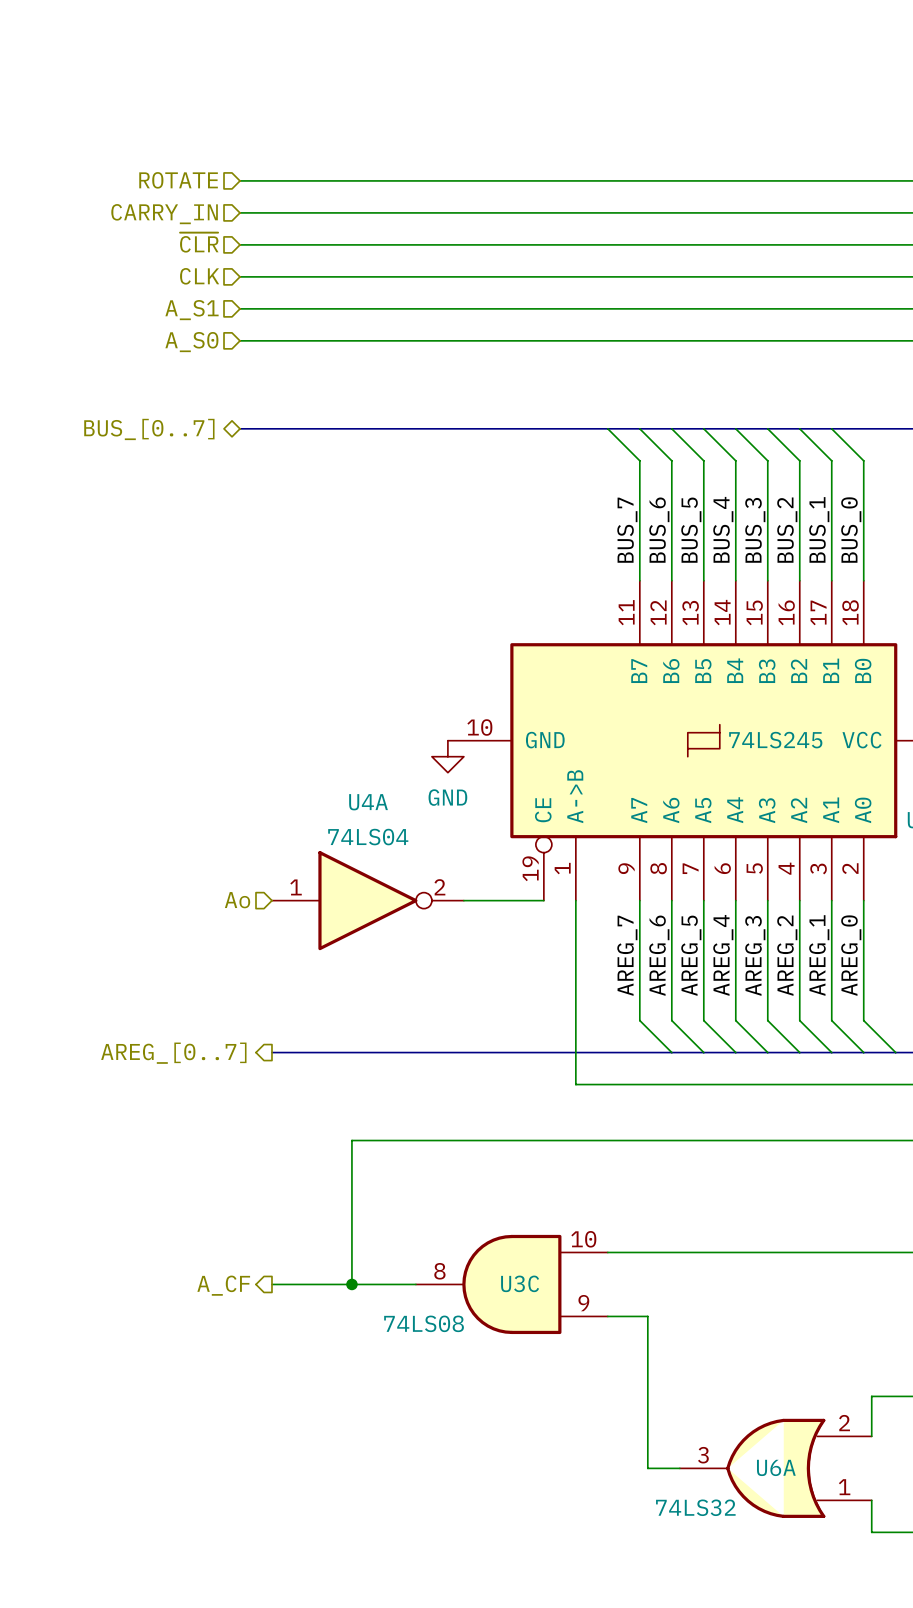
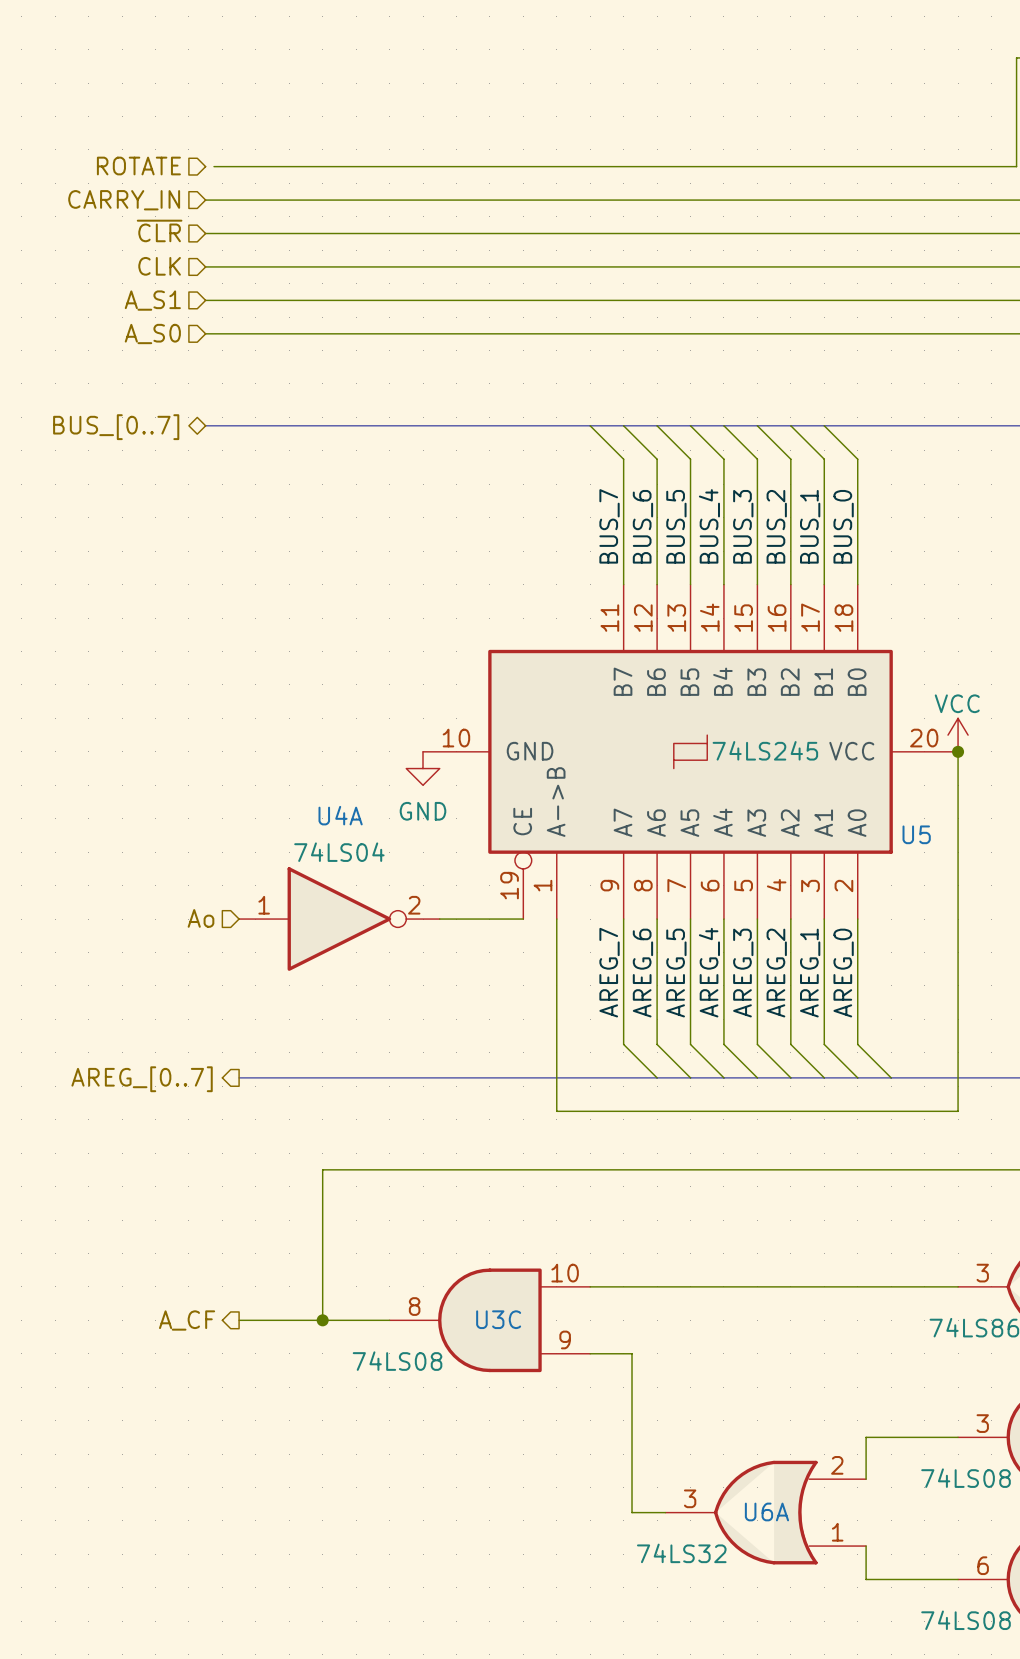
wire: (240, 180) (247, 180) -> none

